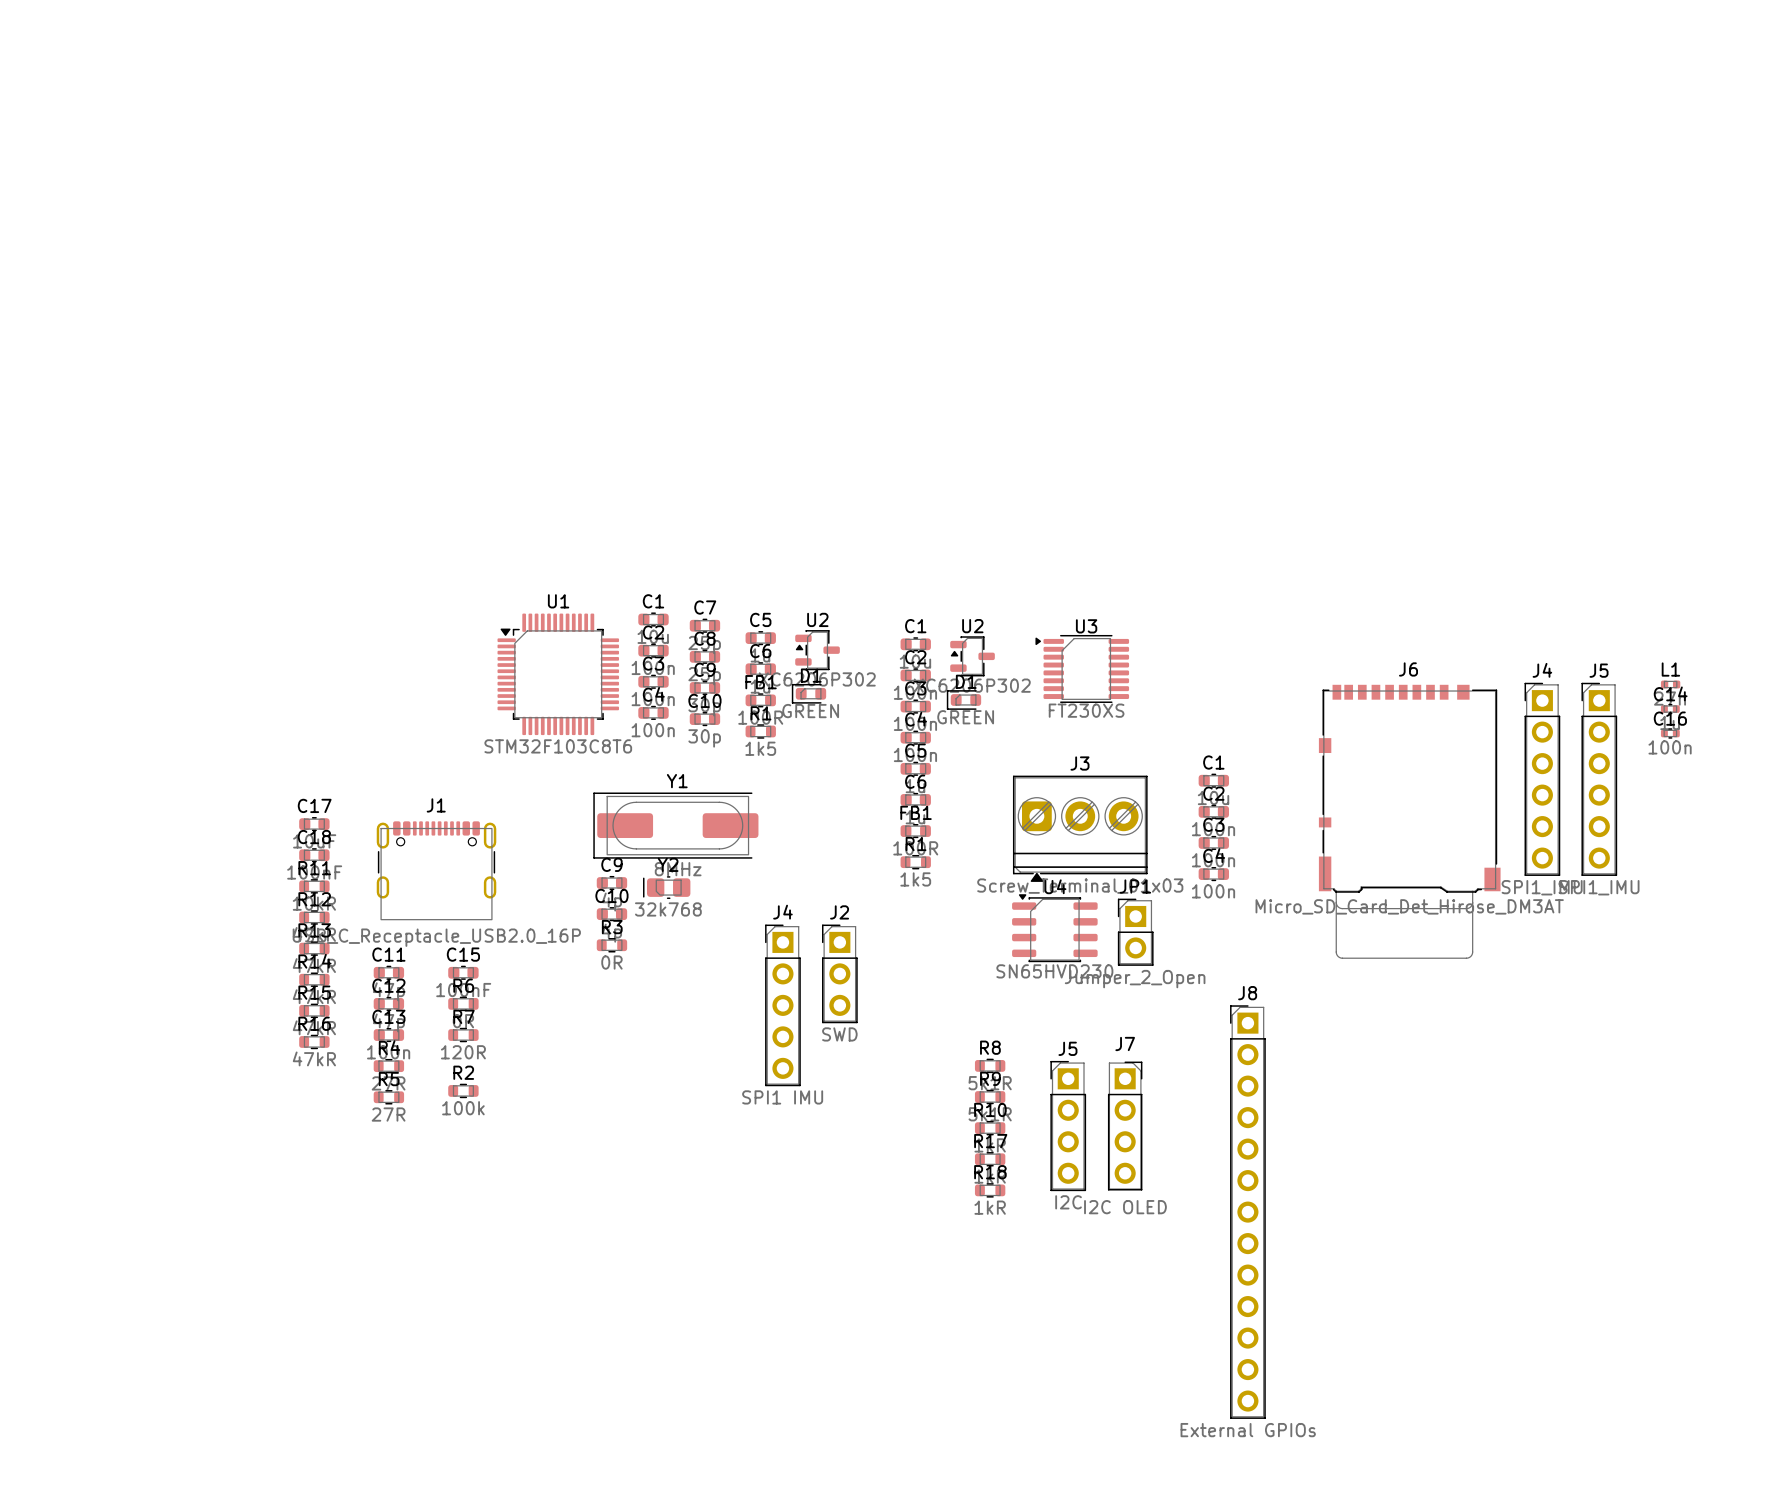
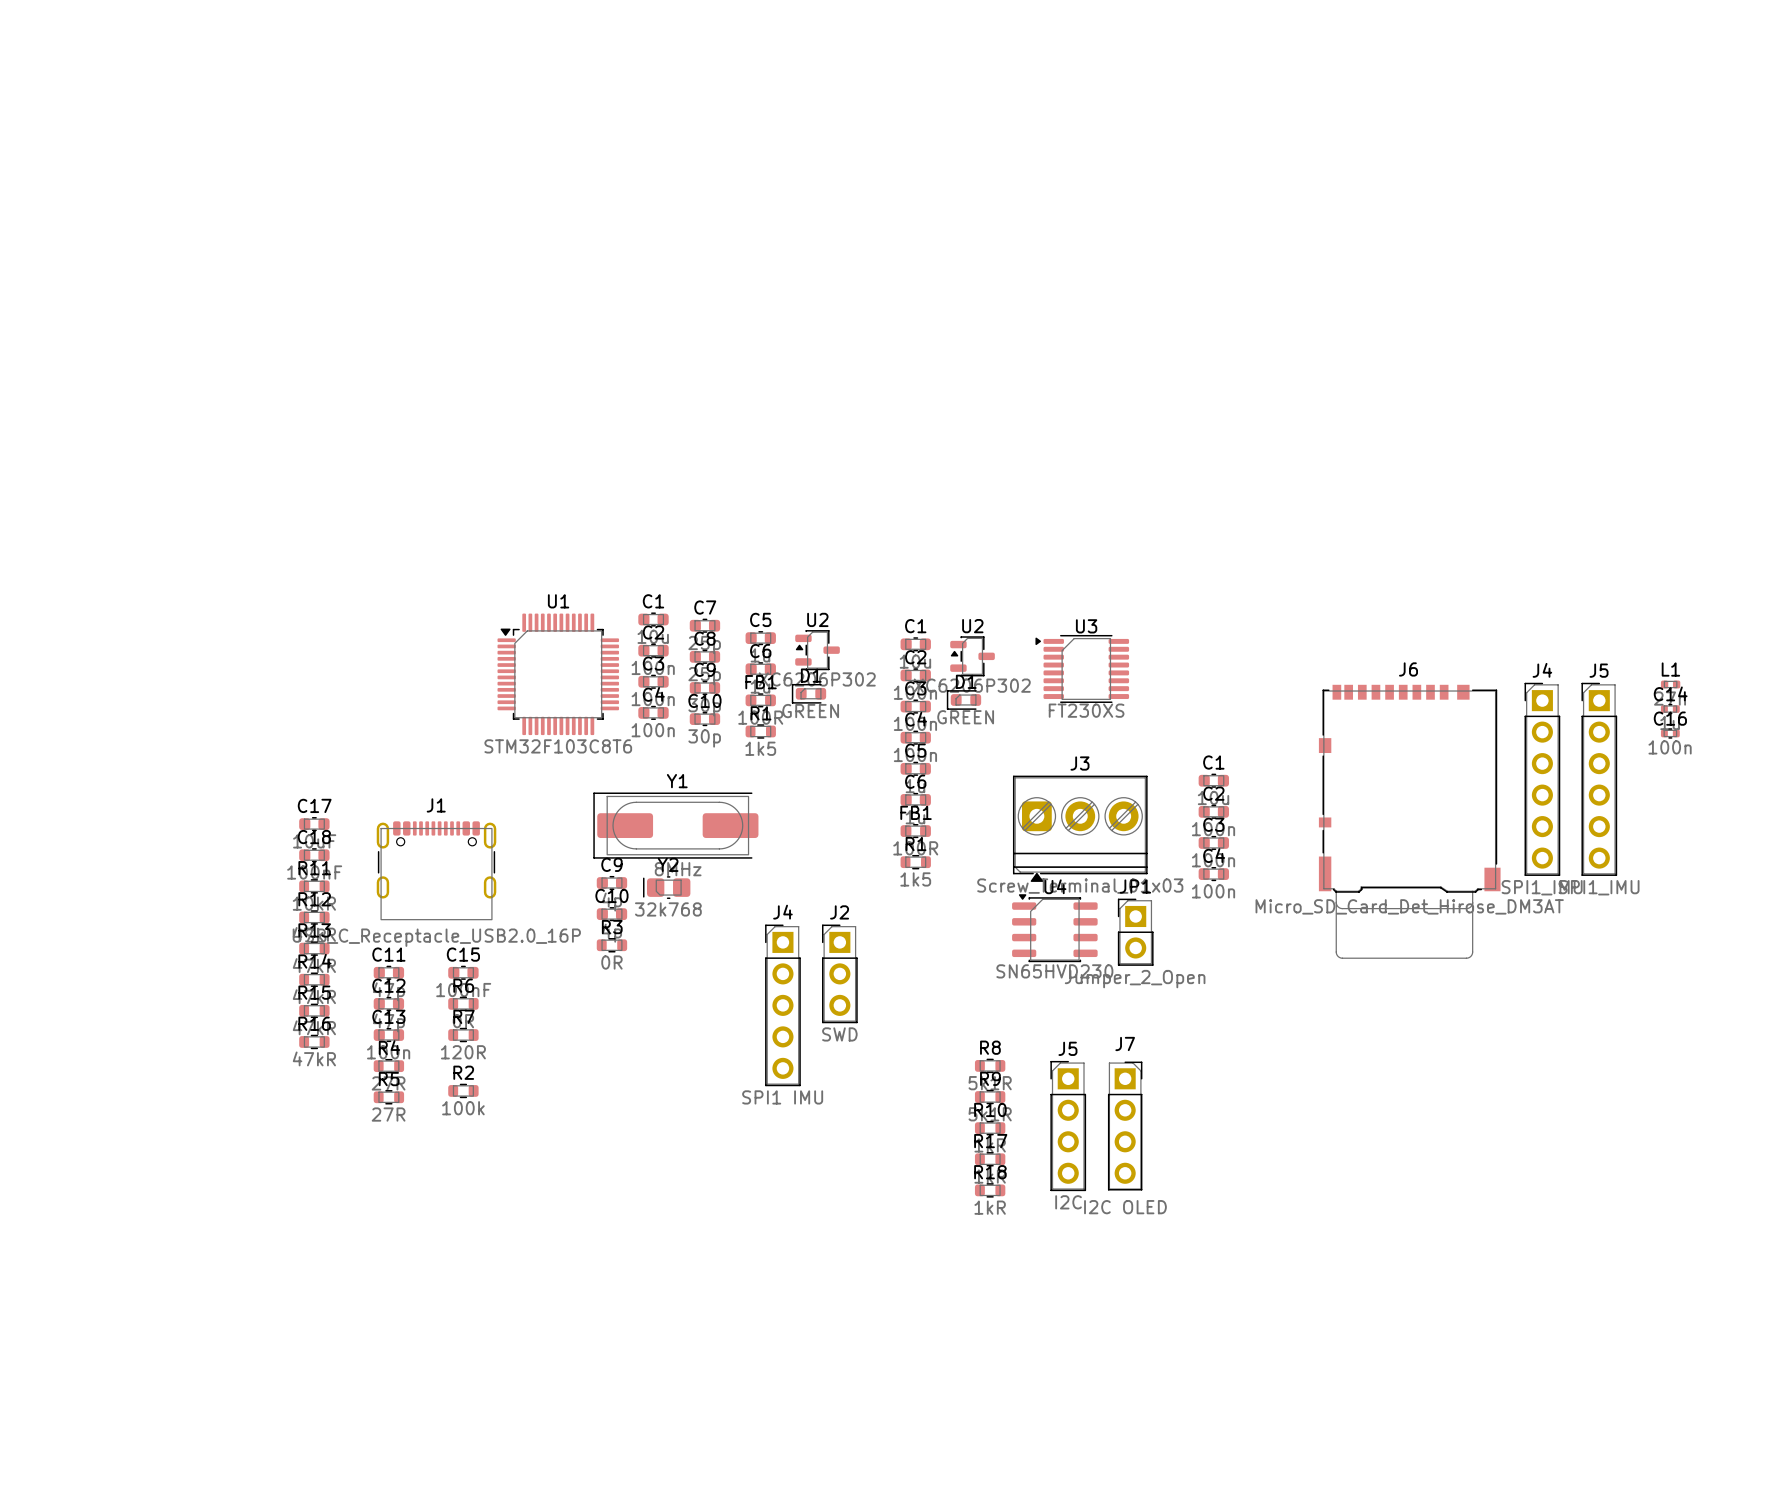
J8: External GPIOs (1247, 1212) -> none

